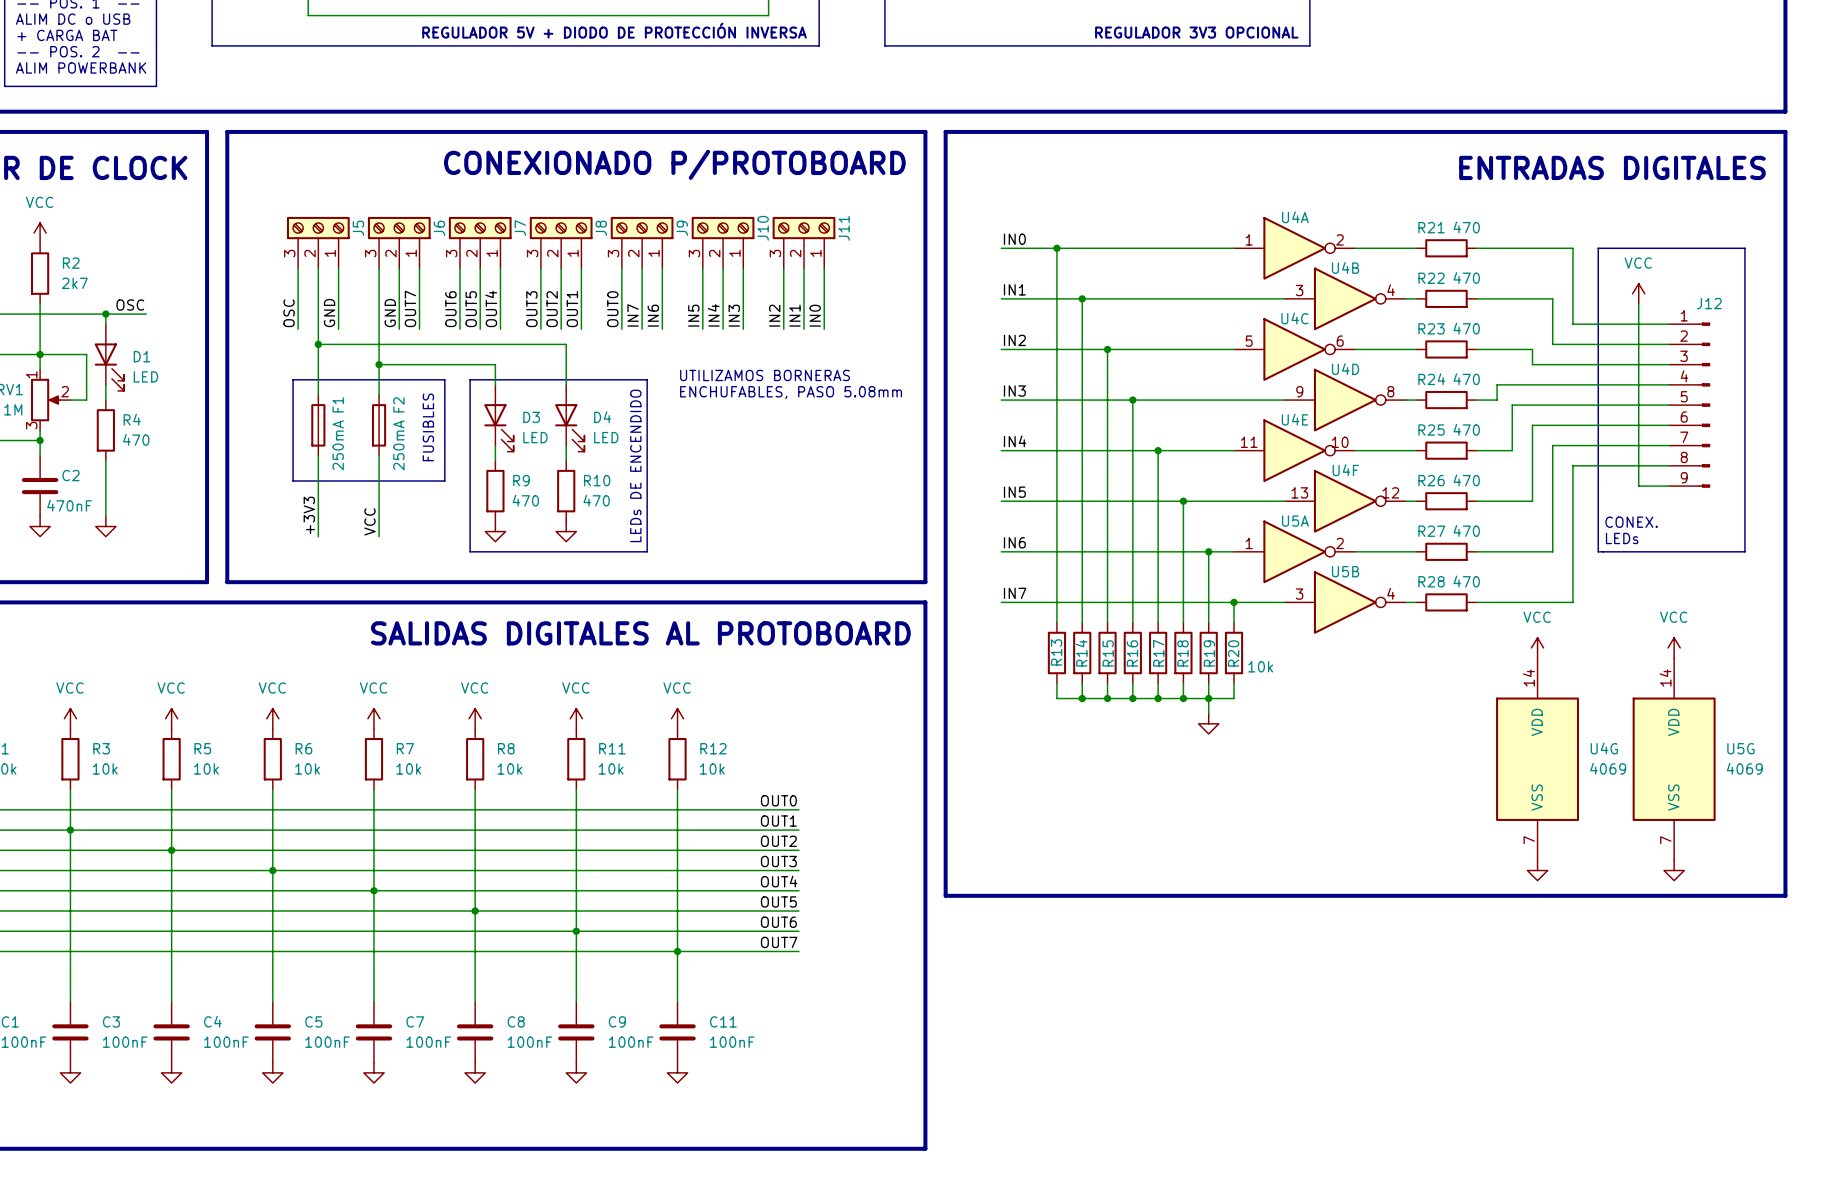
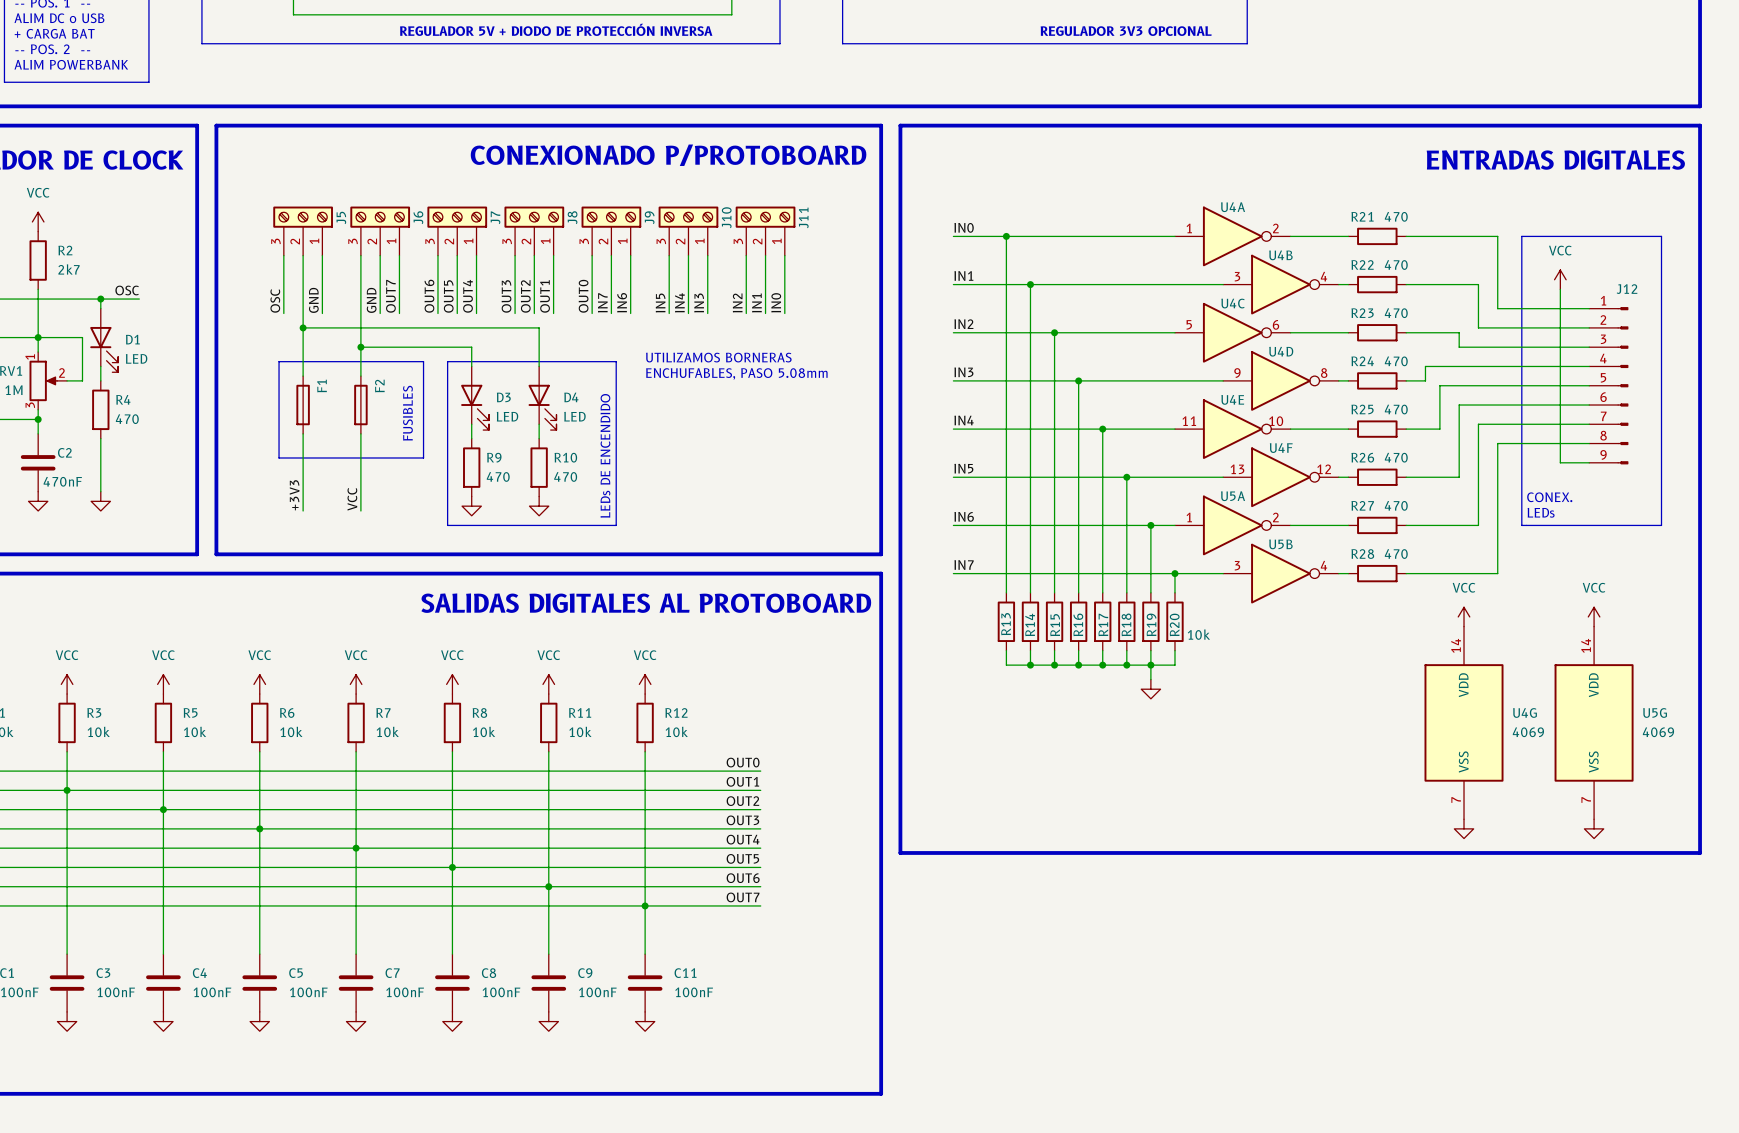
F1 value: 250mA (338, 445) -> none
F2 value: 250mA (398, 445) -> none

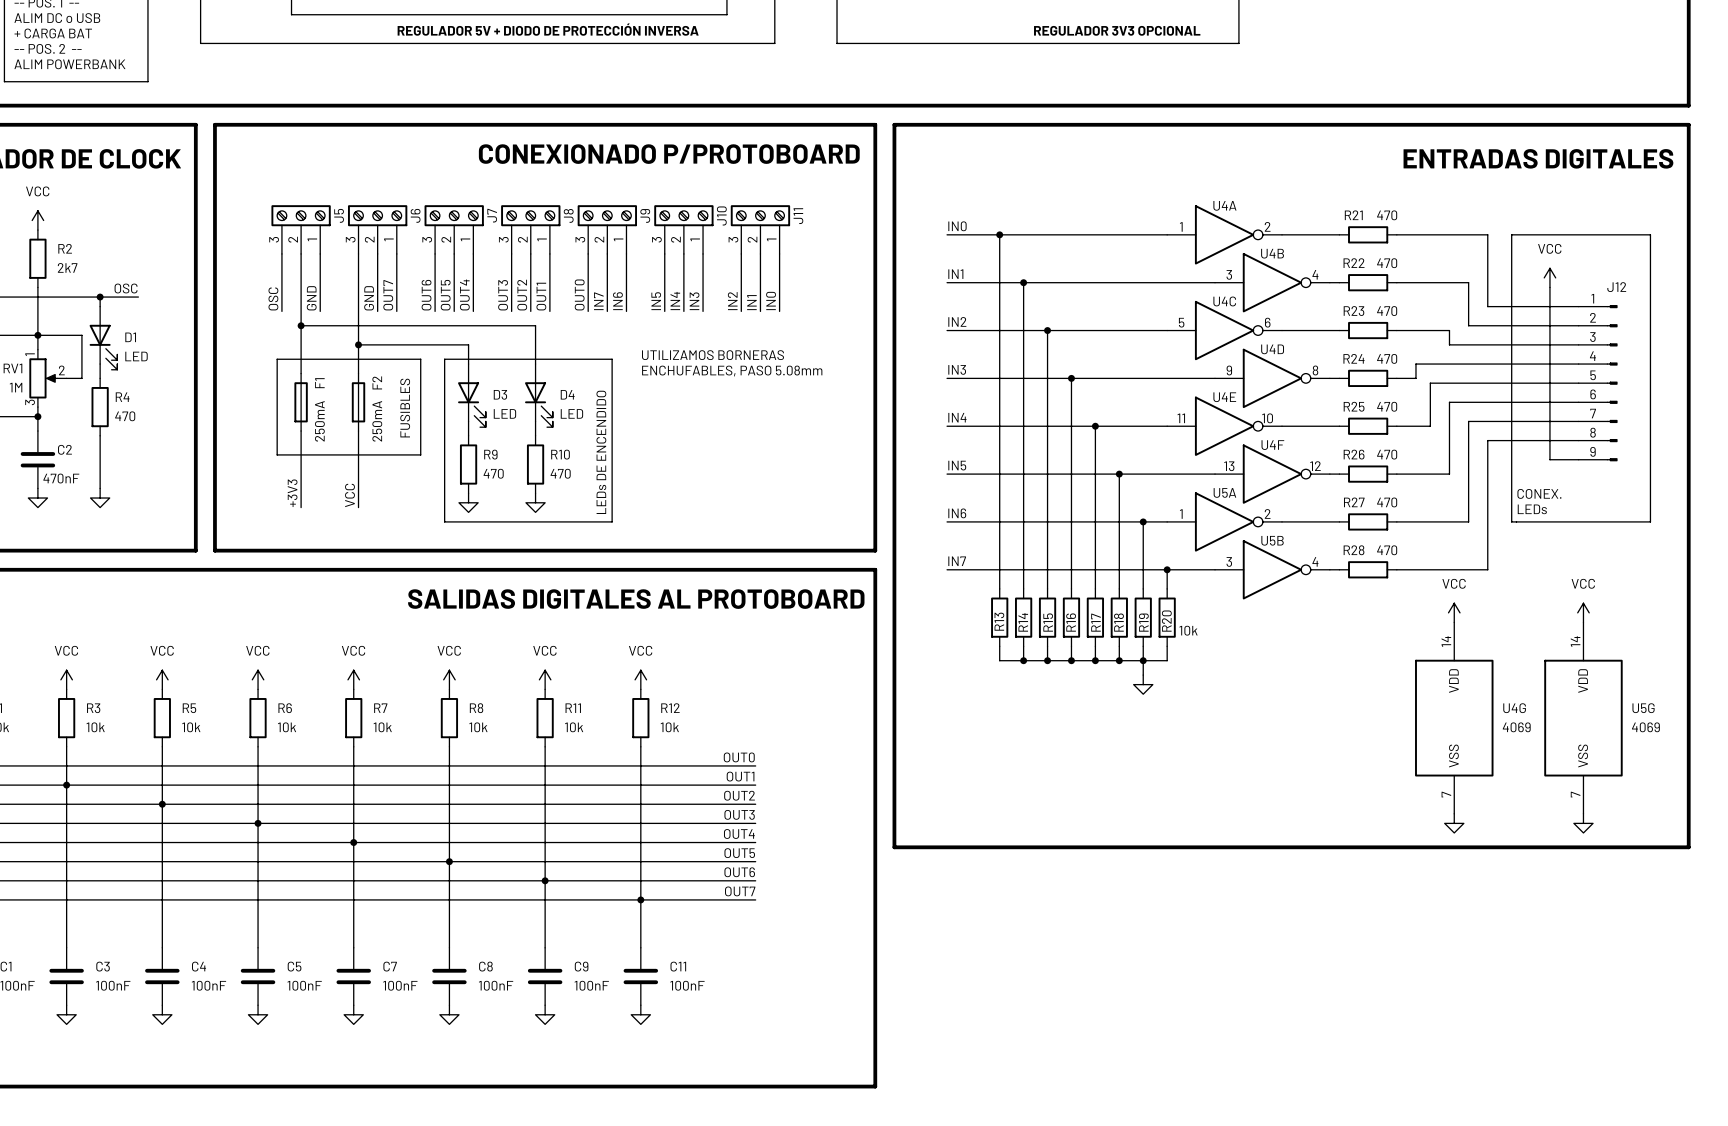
F1 value: none -> 250mA (319, 421)
F2 value: none -> 250mA (377, 421)

